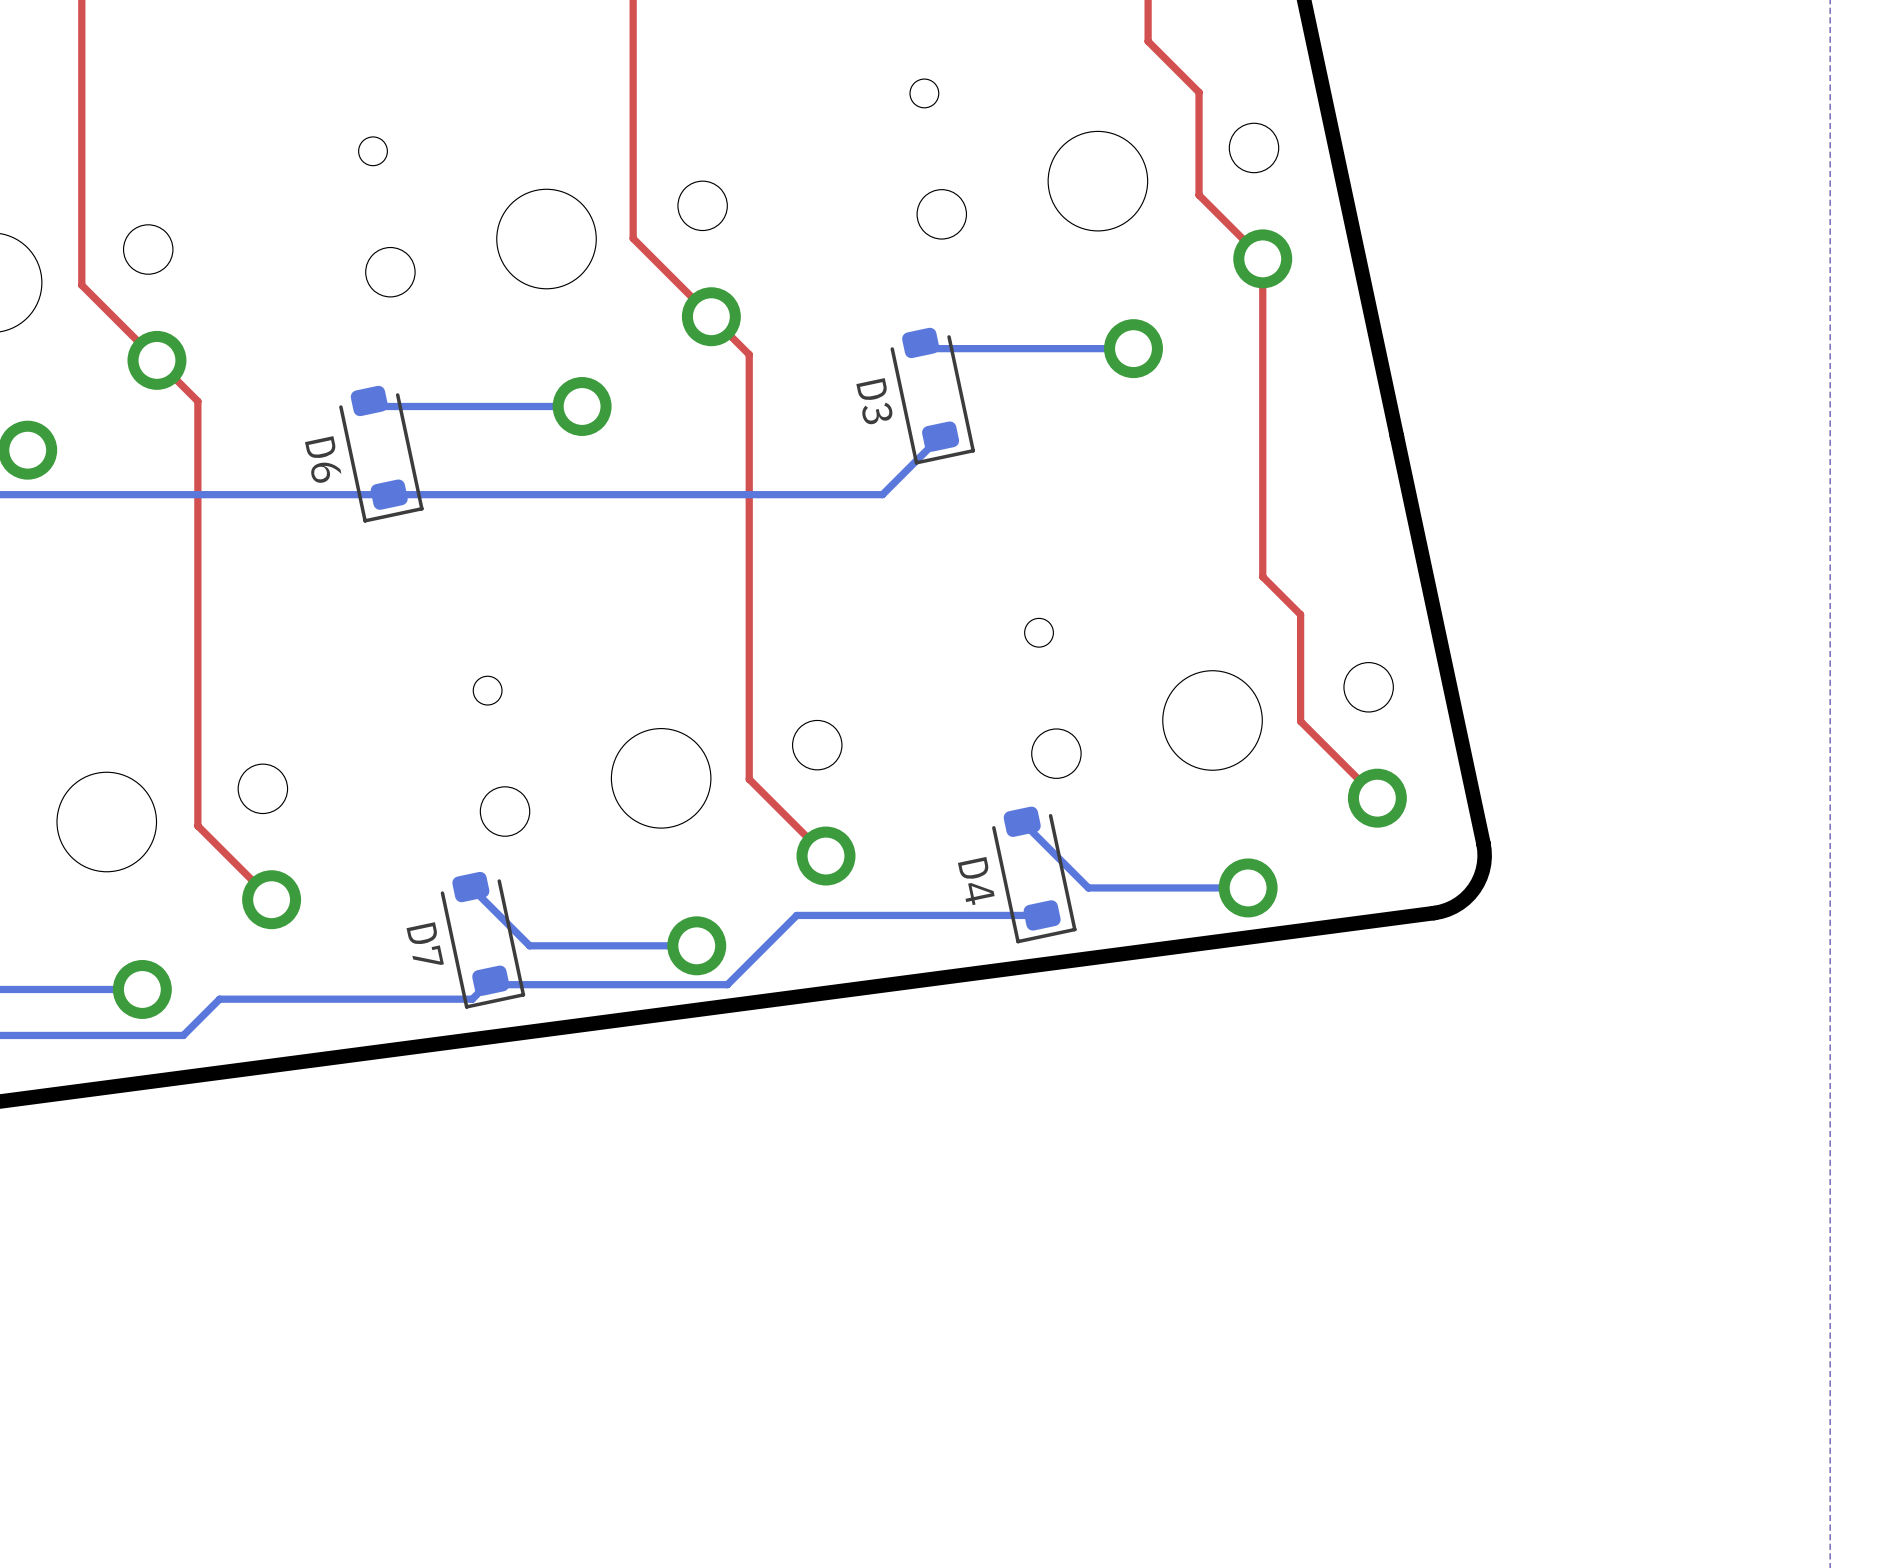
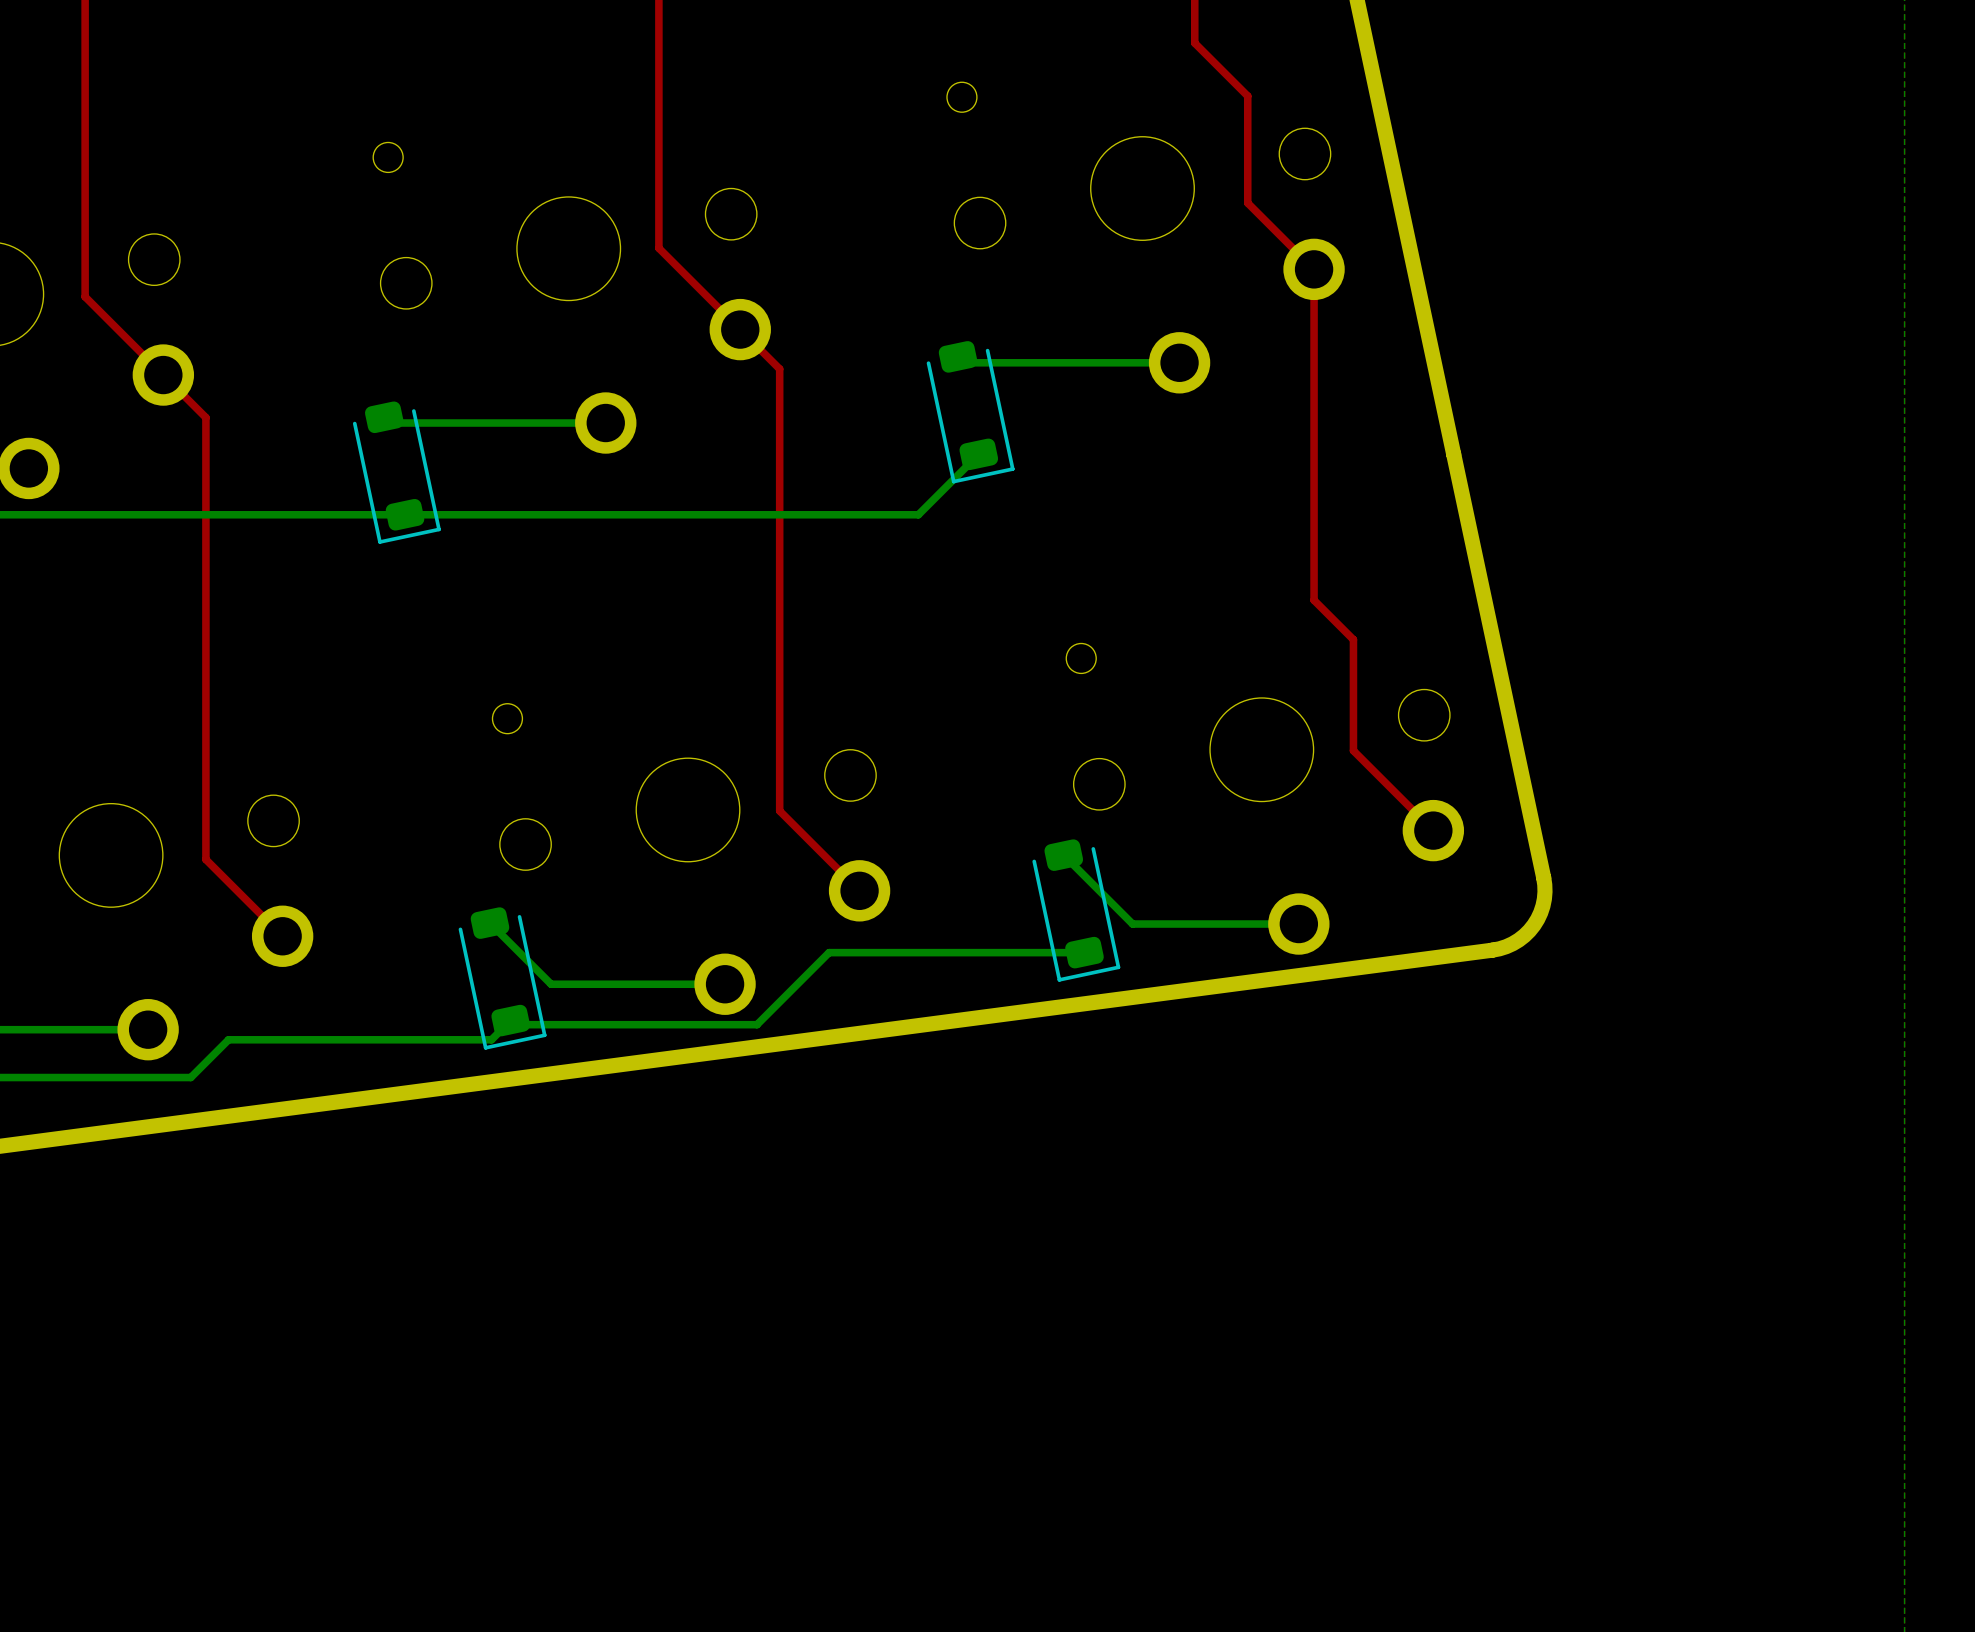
D3 name: D3 (874, 401) -> none
D6 name: D6 (323, 459) -> none
D4 name: D4 (976, 881) -> none
D7 name: D7 (425, 943) -> none

